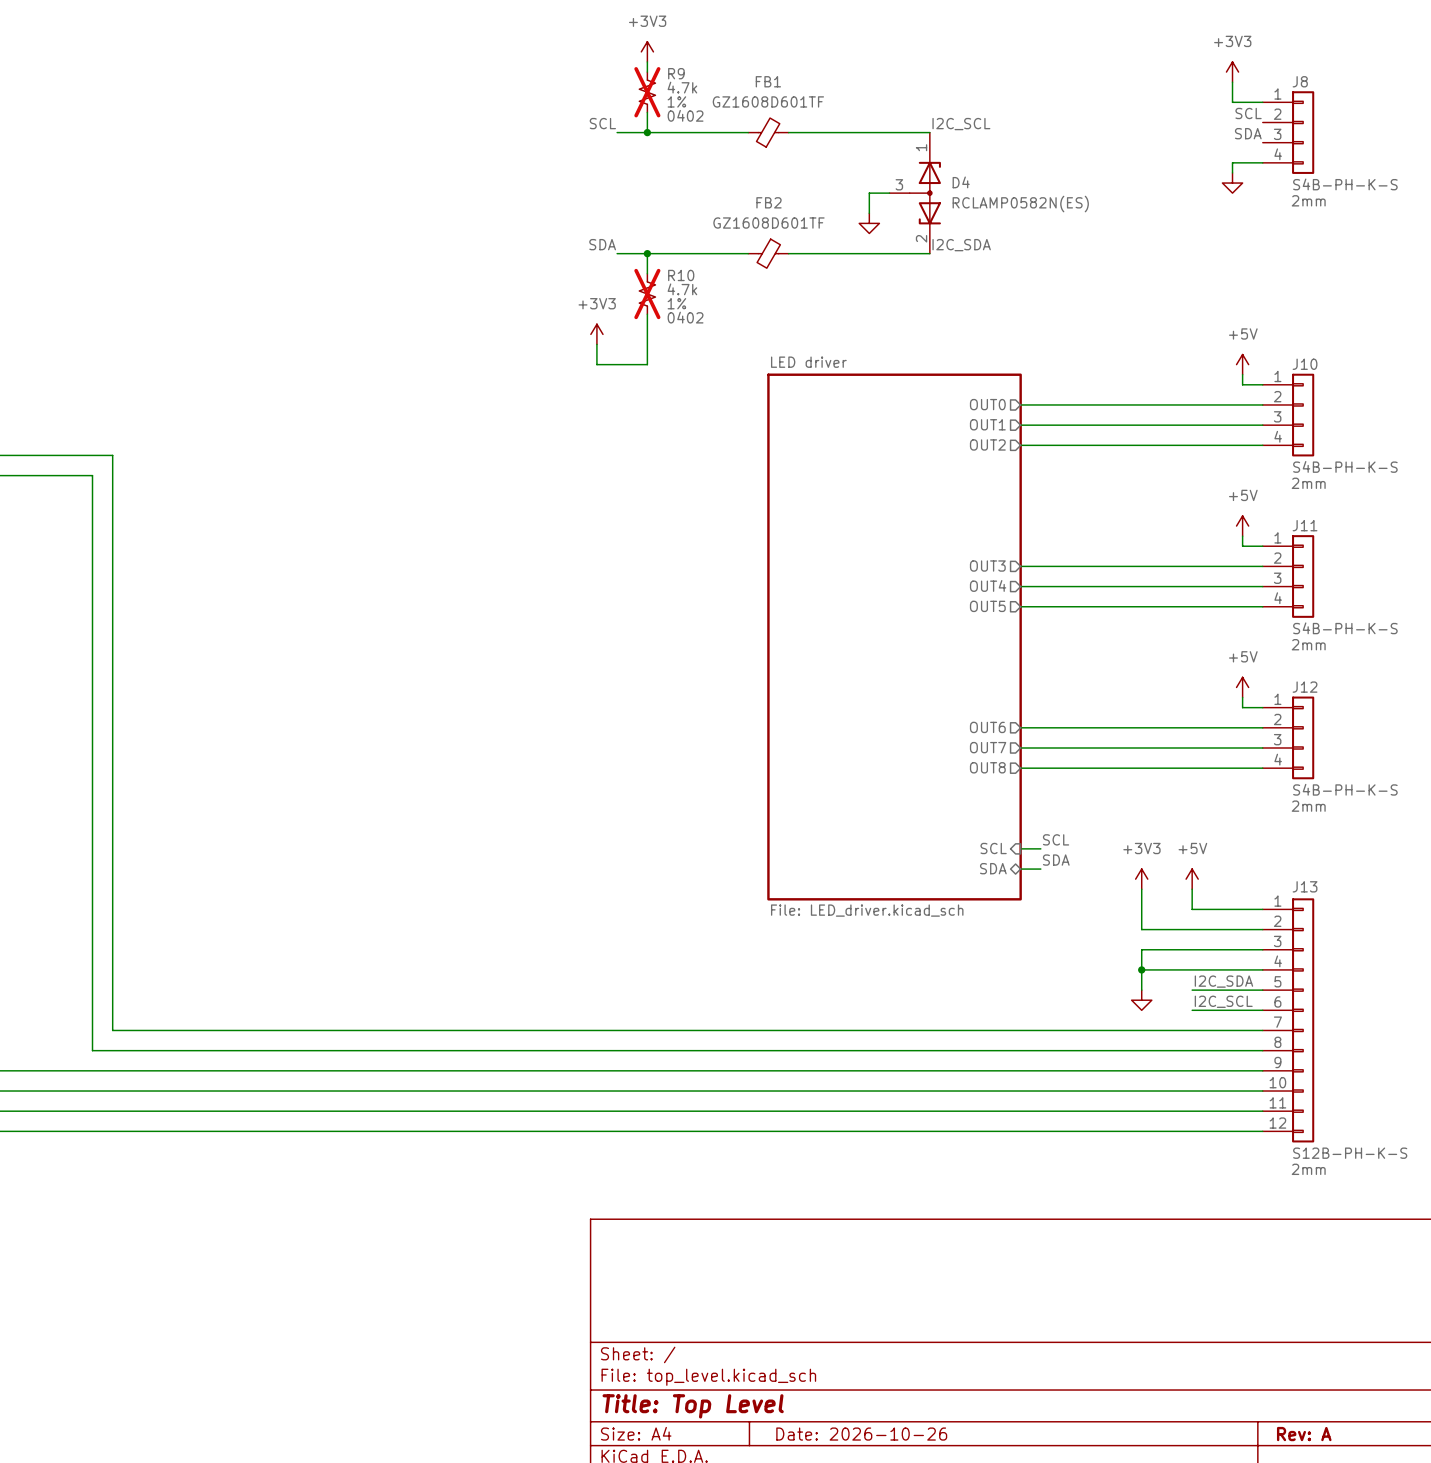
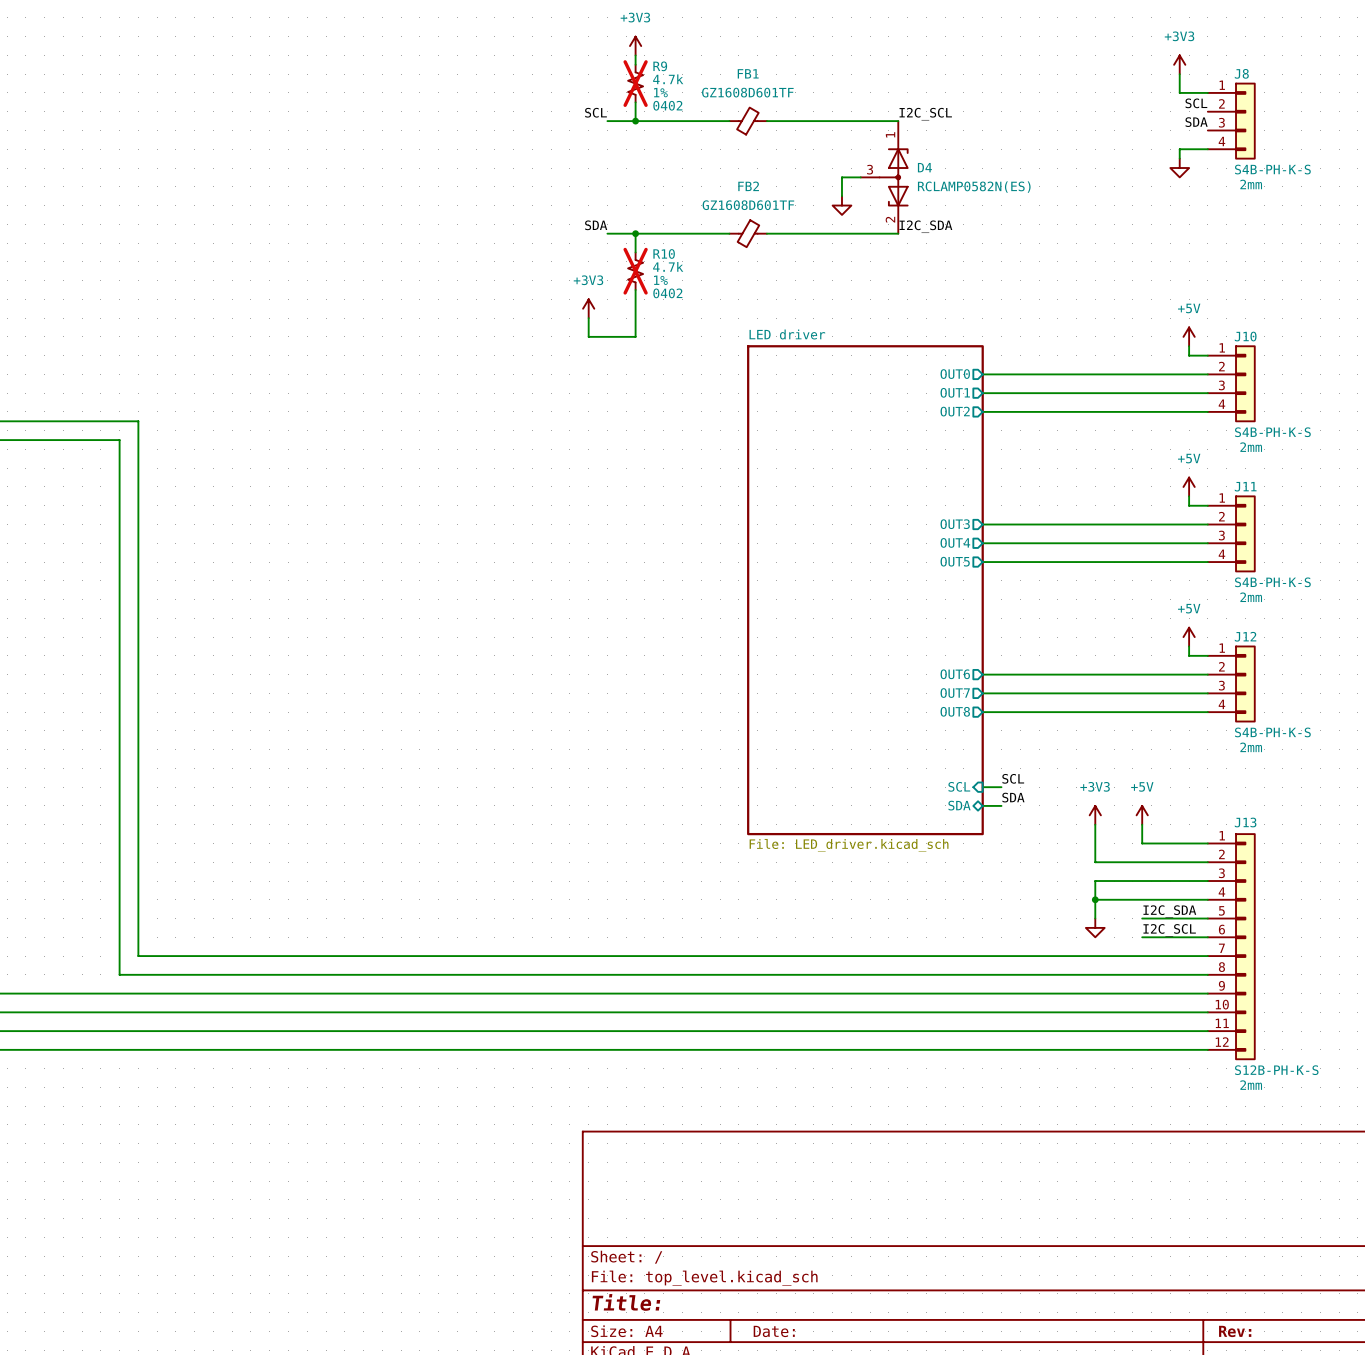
title block: Title: Top Level (693, 1406) -> Title: (626, 1302)
title block: Date: 2026-10-26 (861, 1434) -> Date: (774, 1331)
title block: Rev: A (1304, 1434) -> Rev: (1235, 1331)

